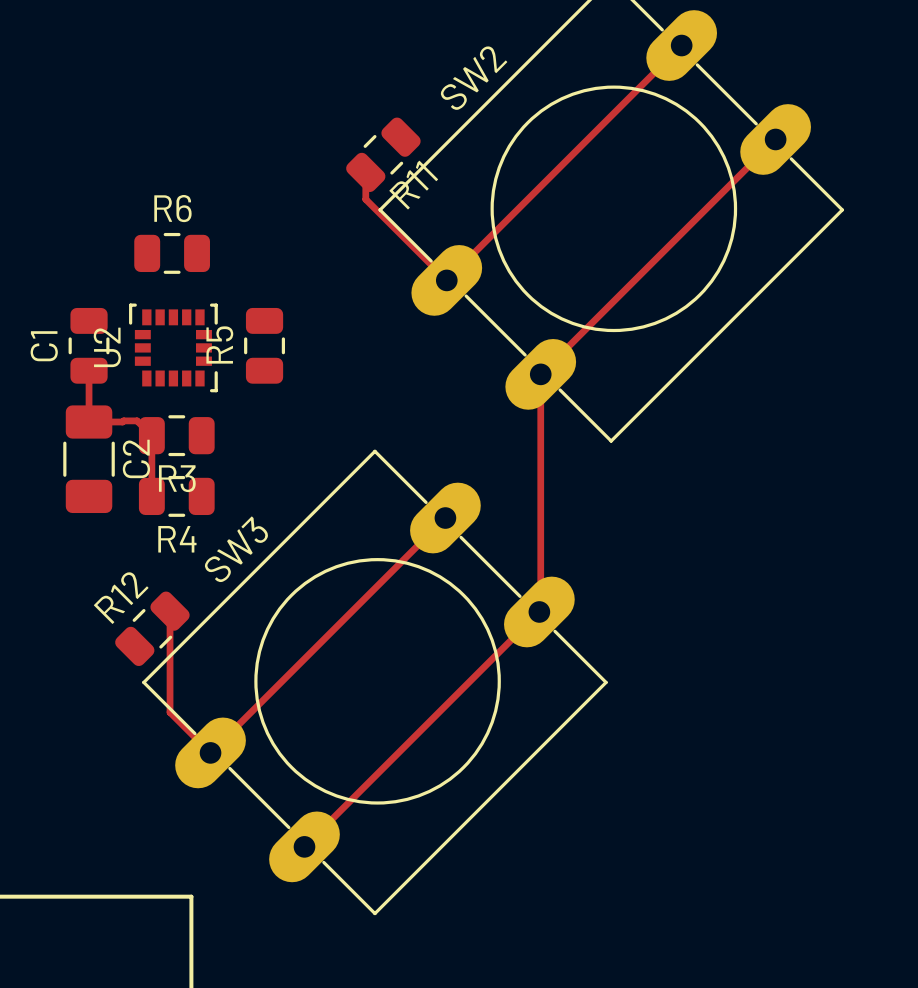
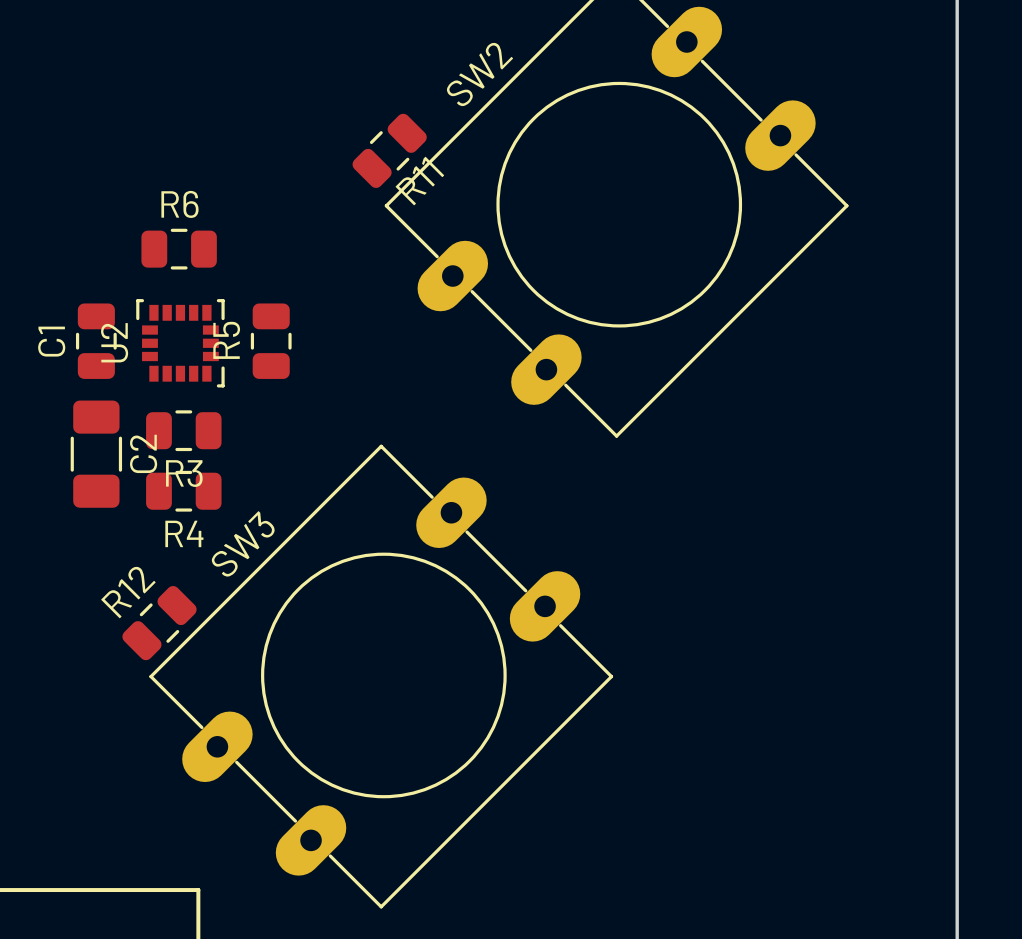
top track: (681, 45) (446, 280) (365, 199) (365, 172) -> none
top track: (775, 139) (540, 374) (540, 610) (304, 846) -> none
top track: (89, 370) (89, 422) (137, 420) (151, 435) (151, 496) -> none
top track: (445, 518) (210, 752) (170, 712) (170, 611) -> none

